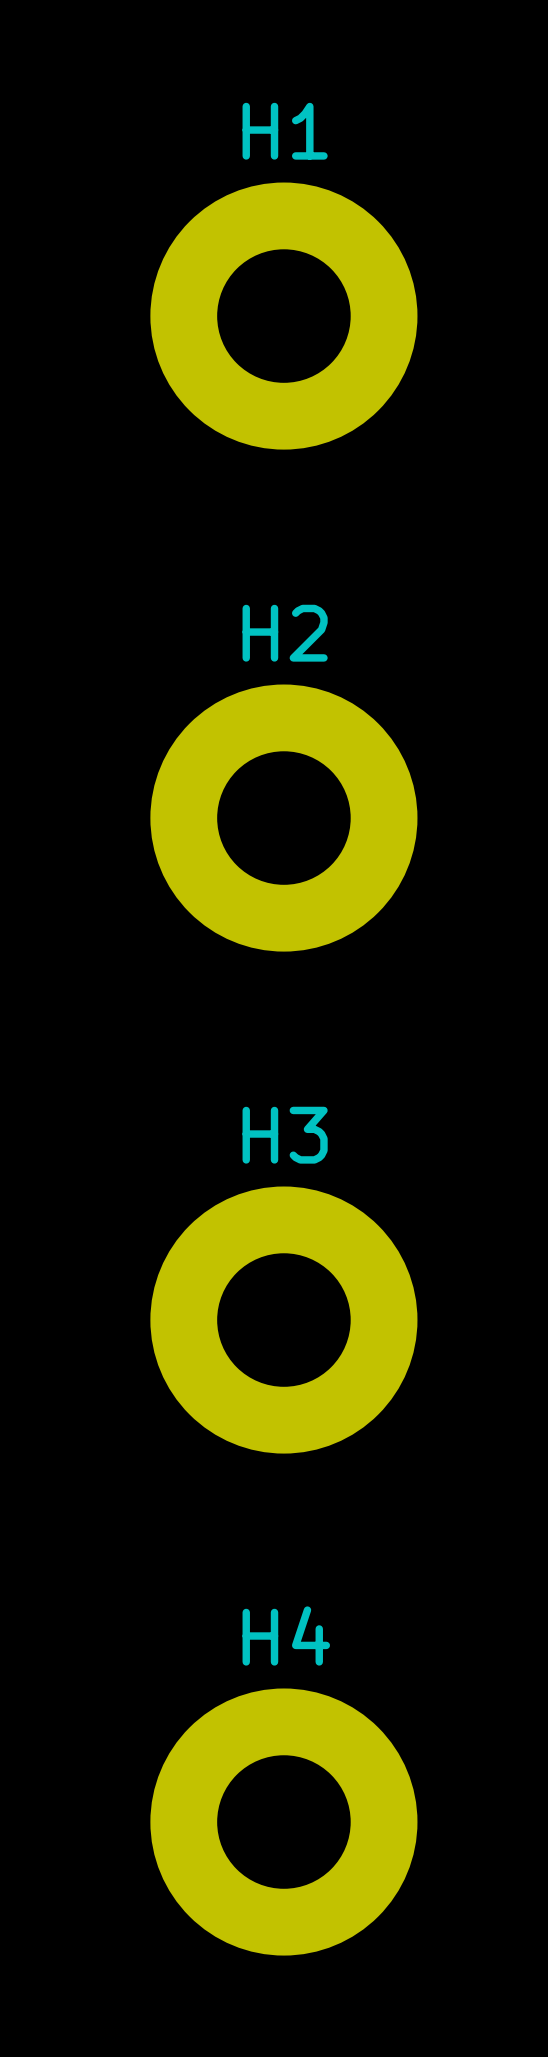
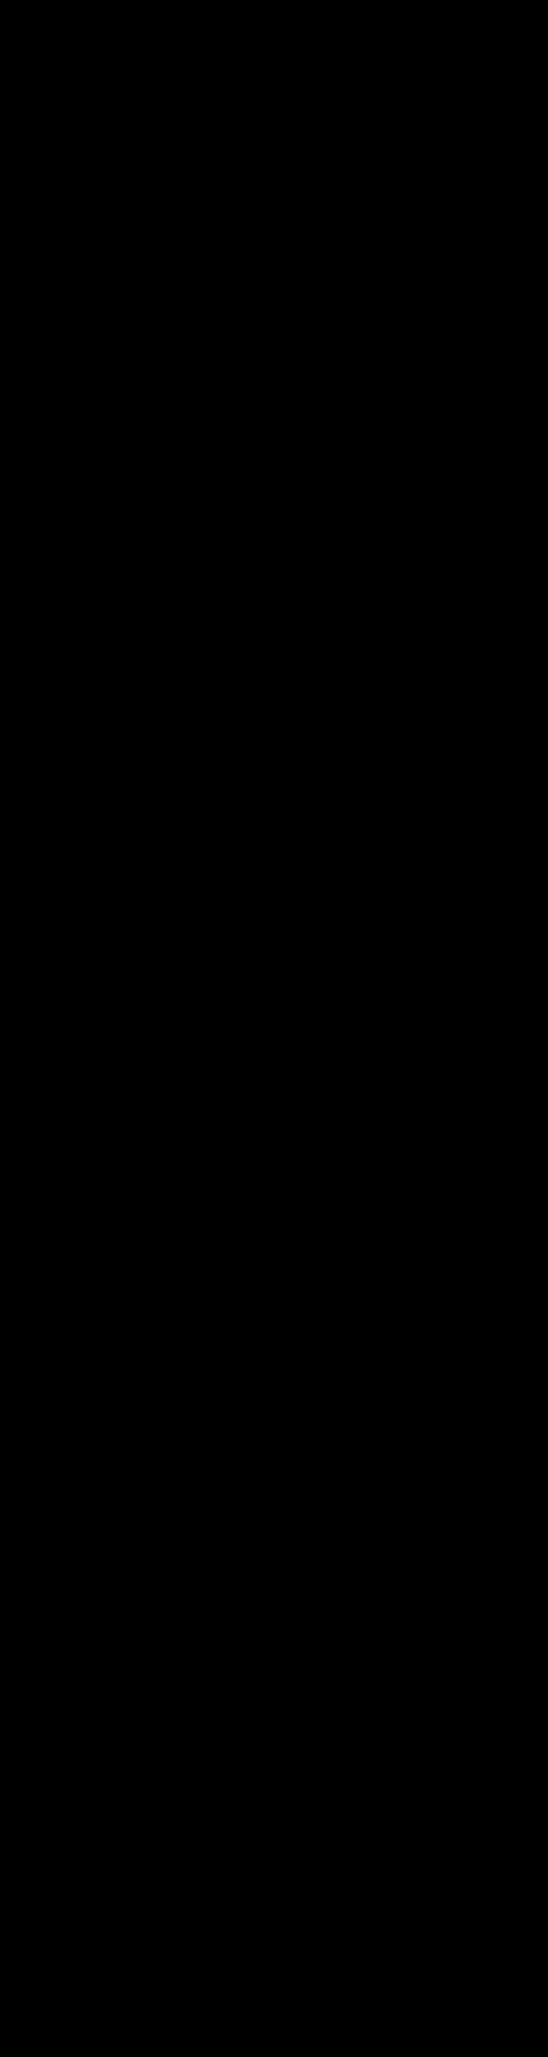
H1: (283, 316) -> none
H2: (283, 818) -> none
H3: (283, 1320) -> none
H4: (283, 1822) -> none

